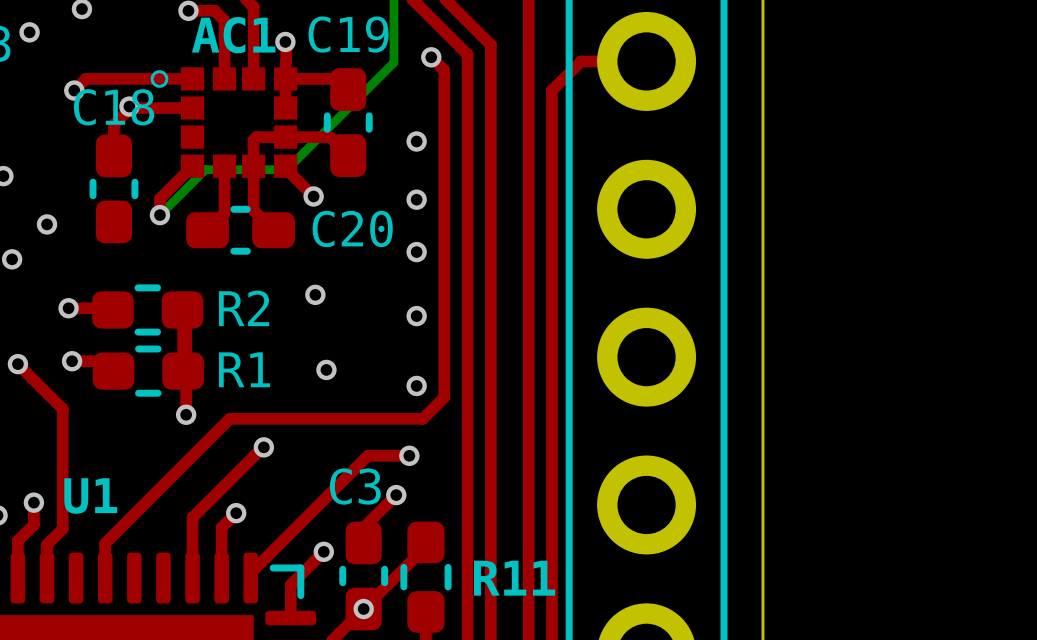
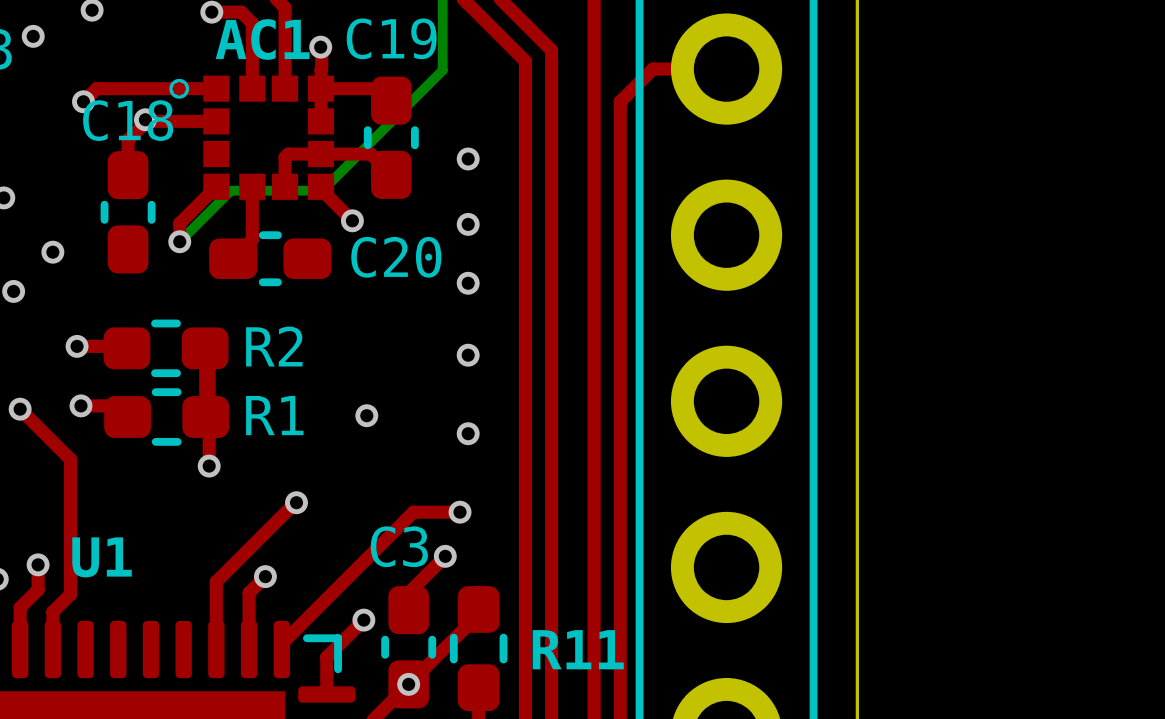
top track: (431, 57) (444, 70) (444, 397) (422, 418) (229, 418) (105, 543) (105, 578) -> none
via: (431, 57) -> none
top track: (253, 166) (253, 210) (273, 230) -> none
via: (315, 294) -> none

